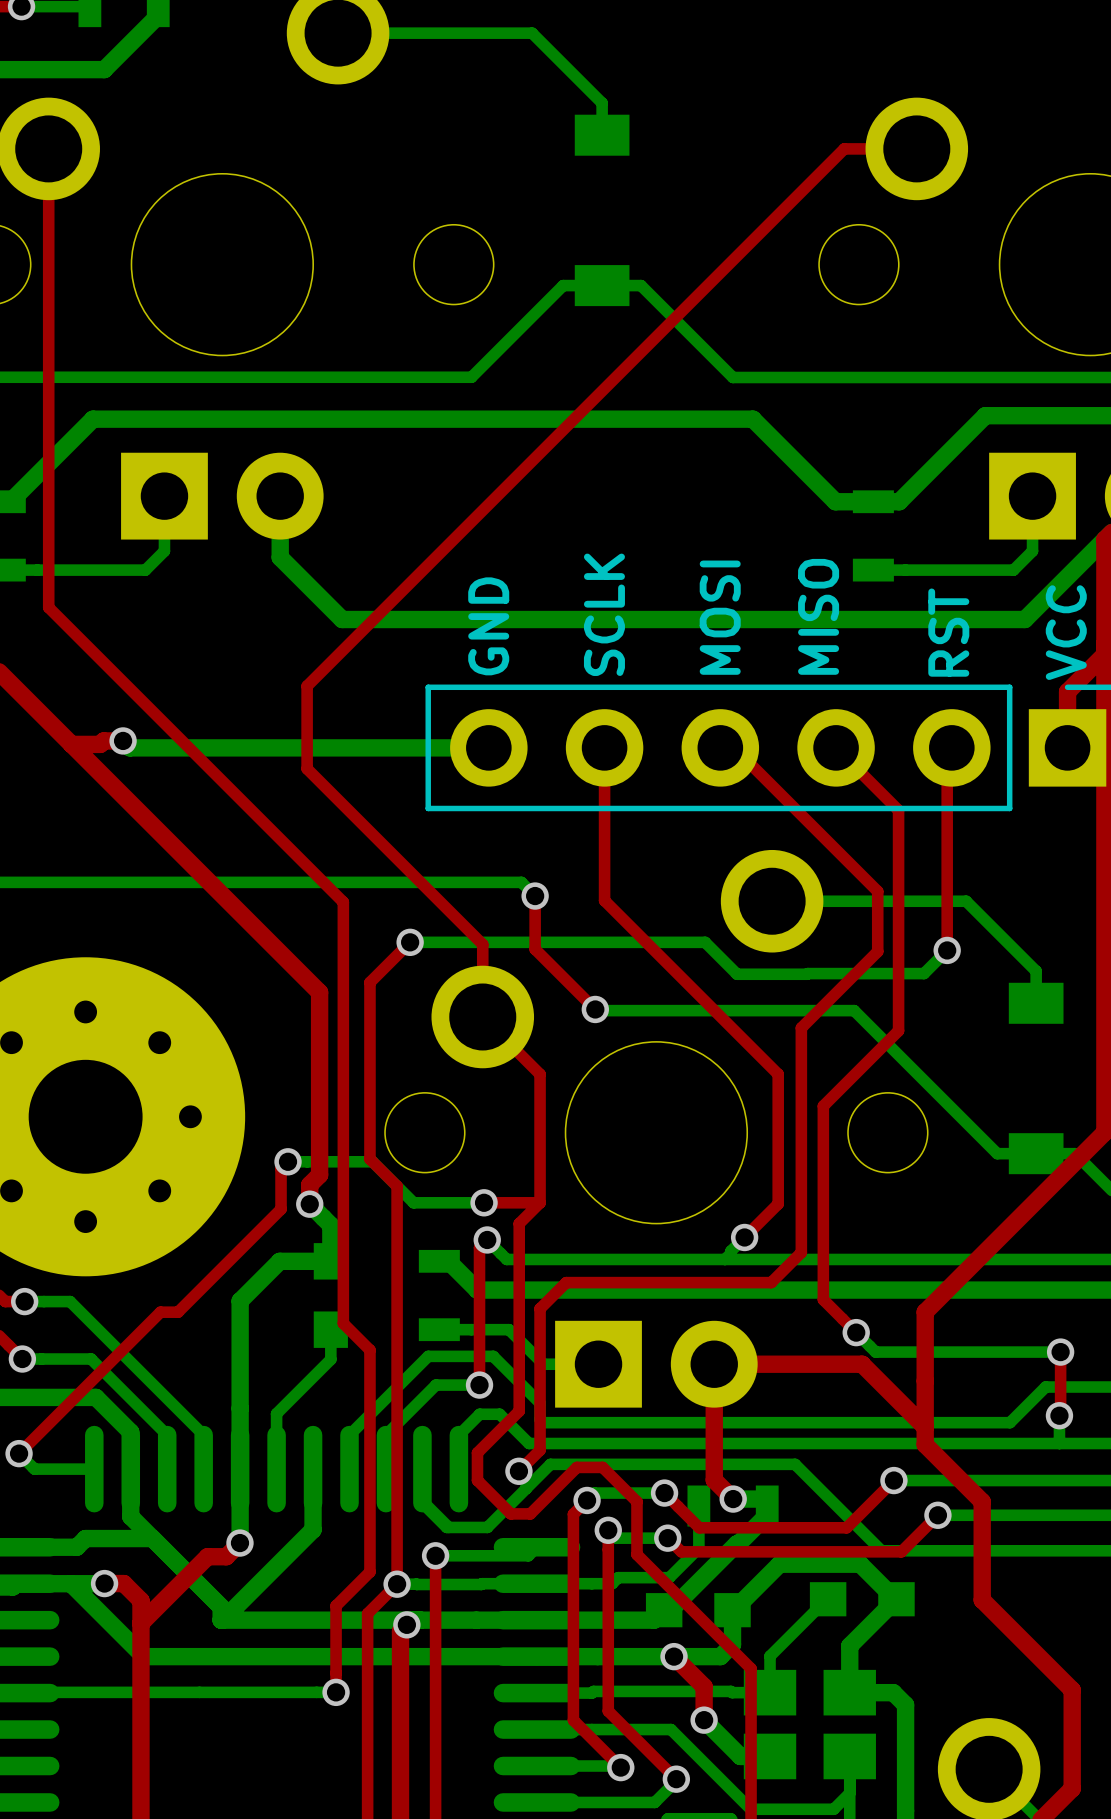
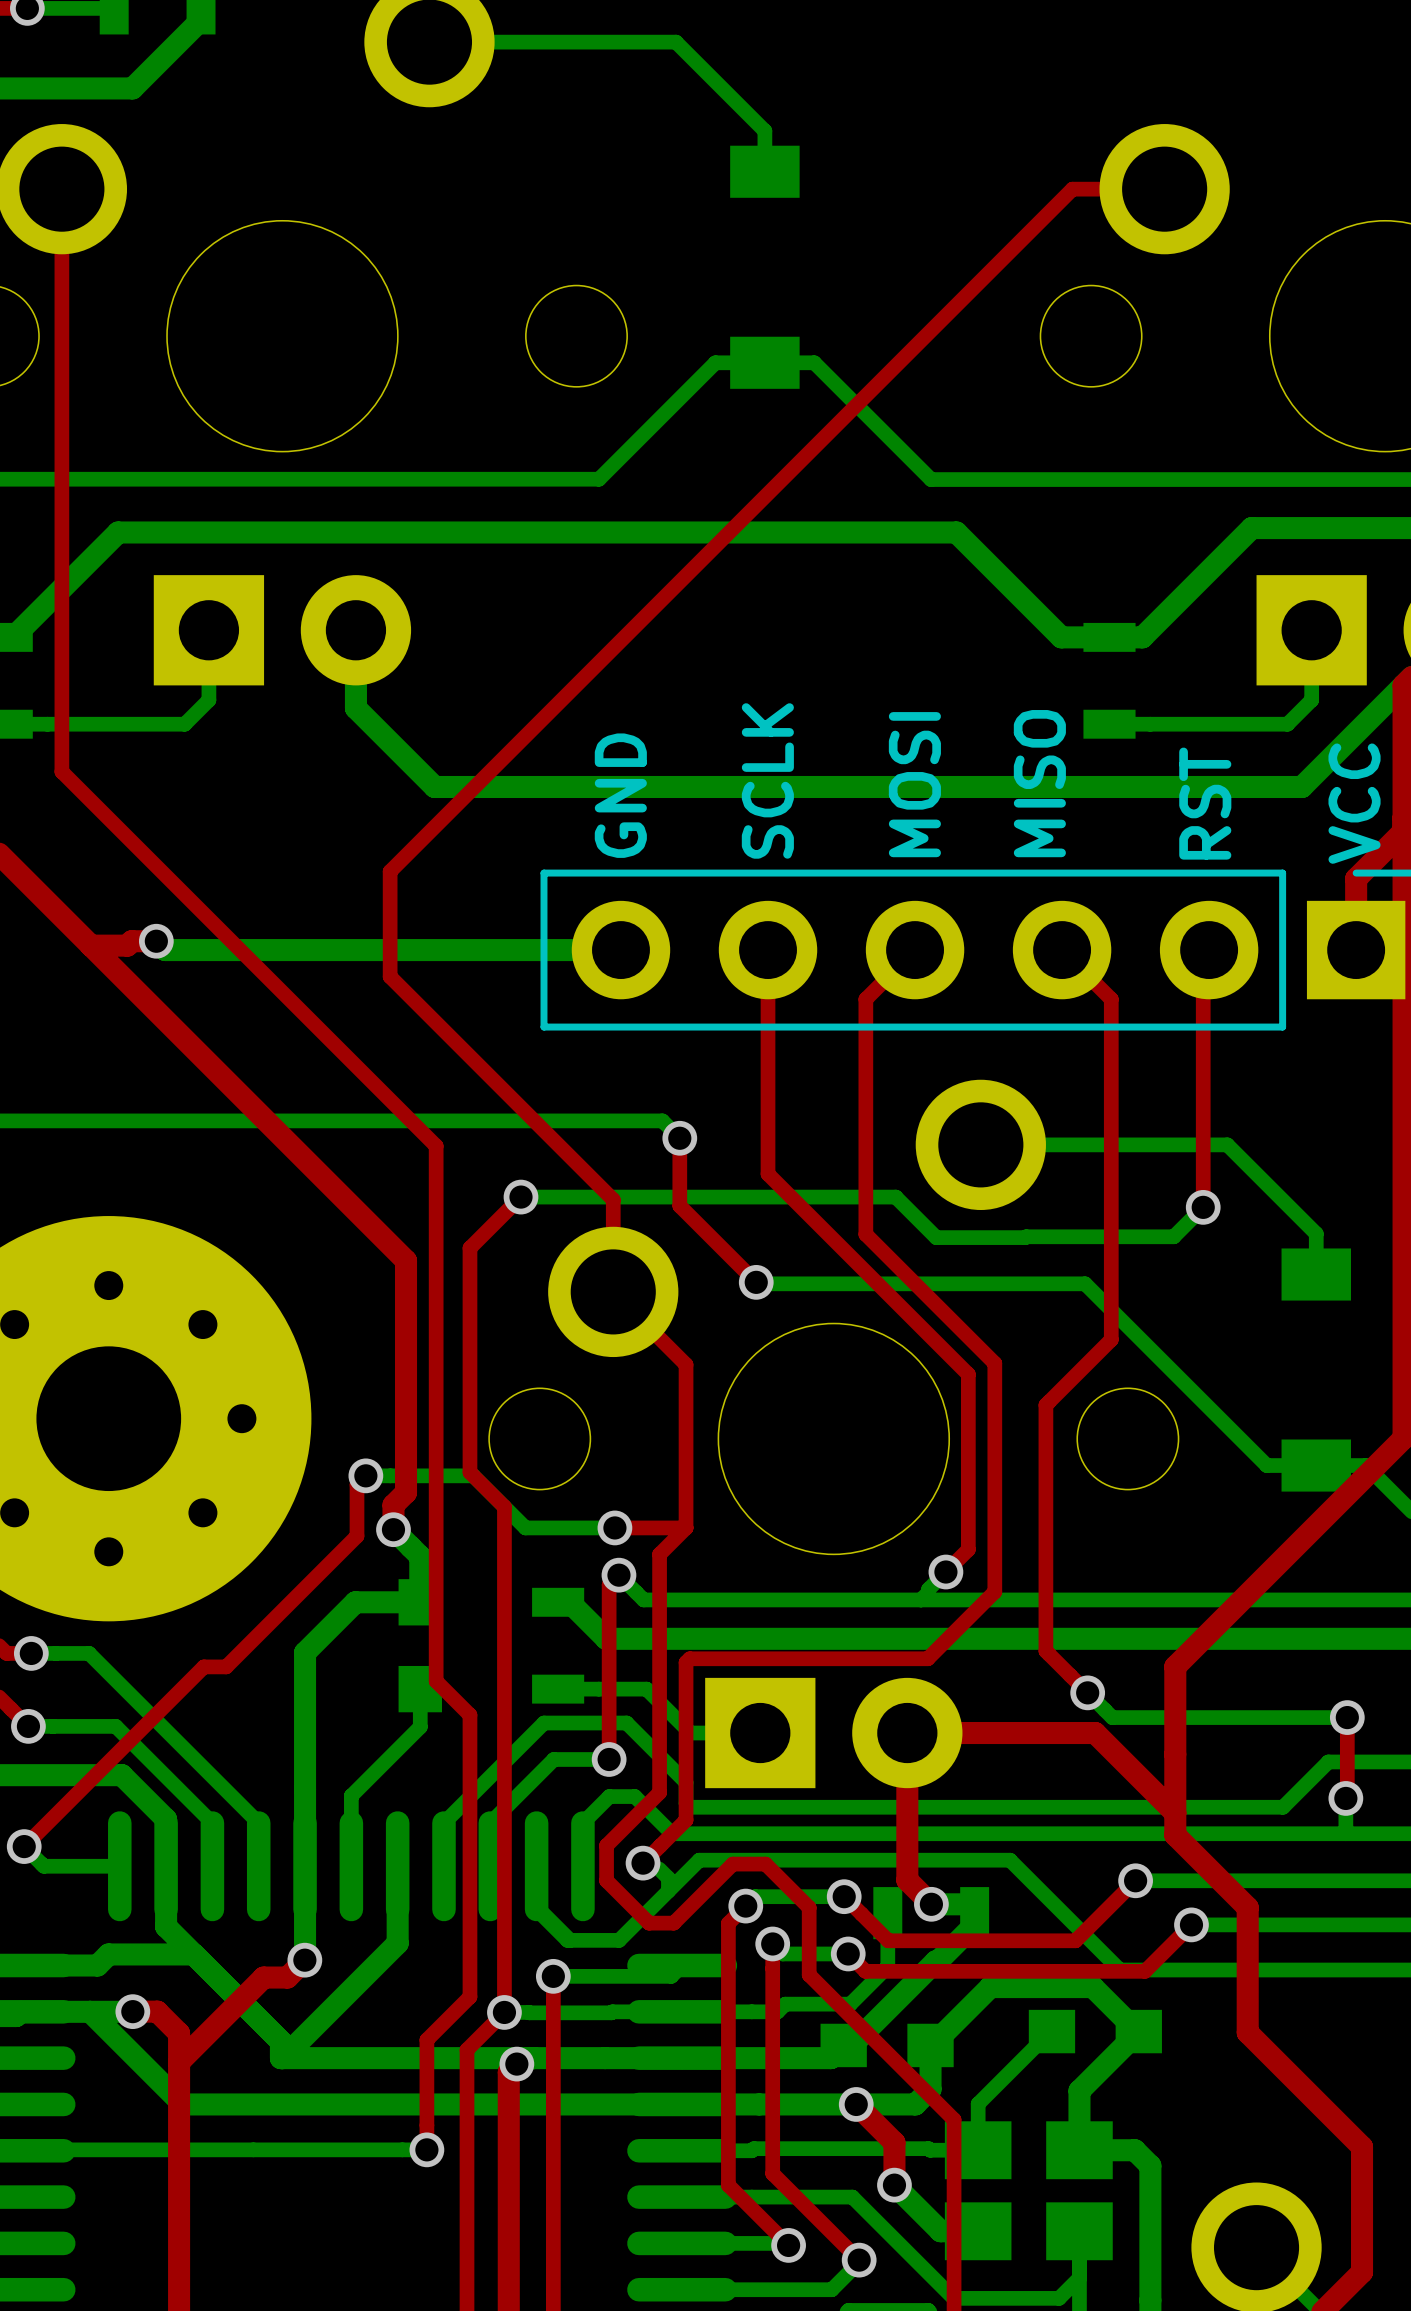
top track: (720, 747) (734, 747) (877, 891) (877, 951) (801, 1027) (801, 1252) (771, 1282) (566, 1282) (543, 1305) -> (915, 950) (865, 999) (865, 1234) (994, 1363) (994, 1591) (927, 1658) (689, 1658)
top track: (874, 786) (898, 810) (898, 1030) (874, 1054) -> (1111, 999) (1111, 1339)
top track: (604, 900) (778, 1074) (778, 1203) (762, 1219) -> (768, 1144) (768, 1174) (968, 1374) (968, 1549)
top track: (540, 1432) (540, 1450) (518, 1471) -> (686, 1820) (643, 1863)
via position: (518, 1471) -> (643, 1863)

